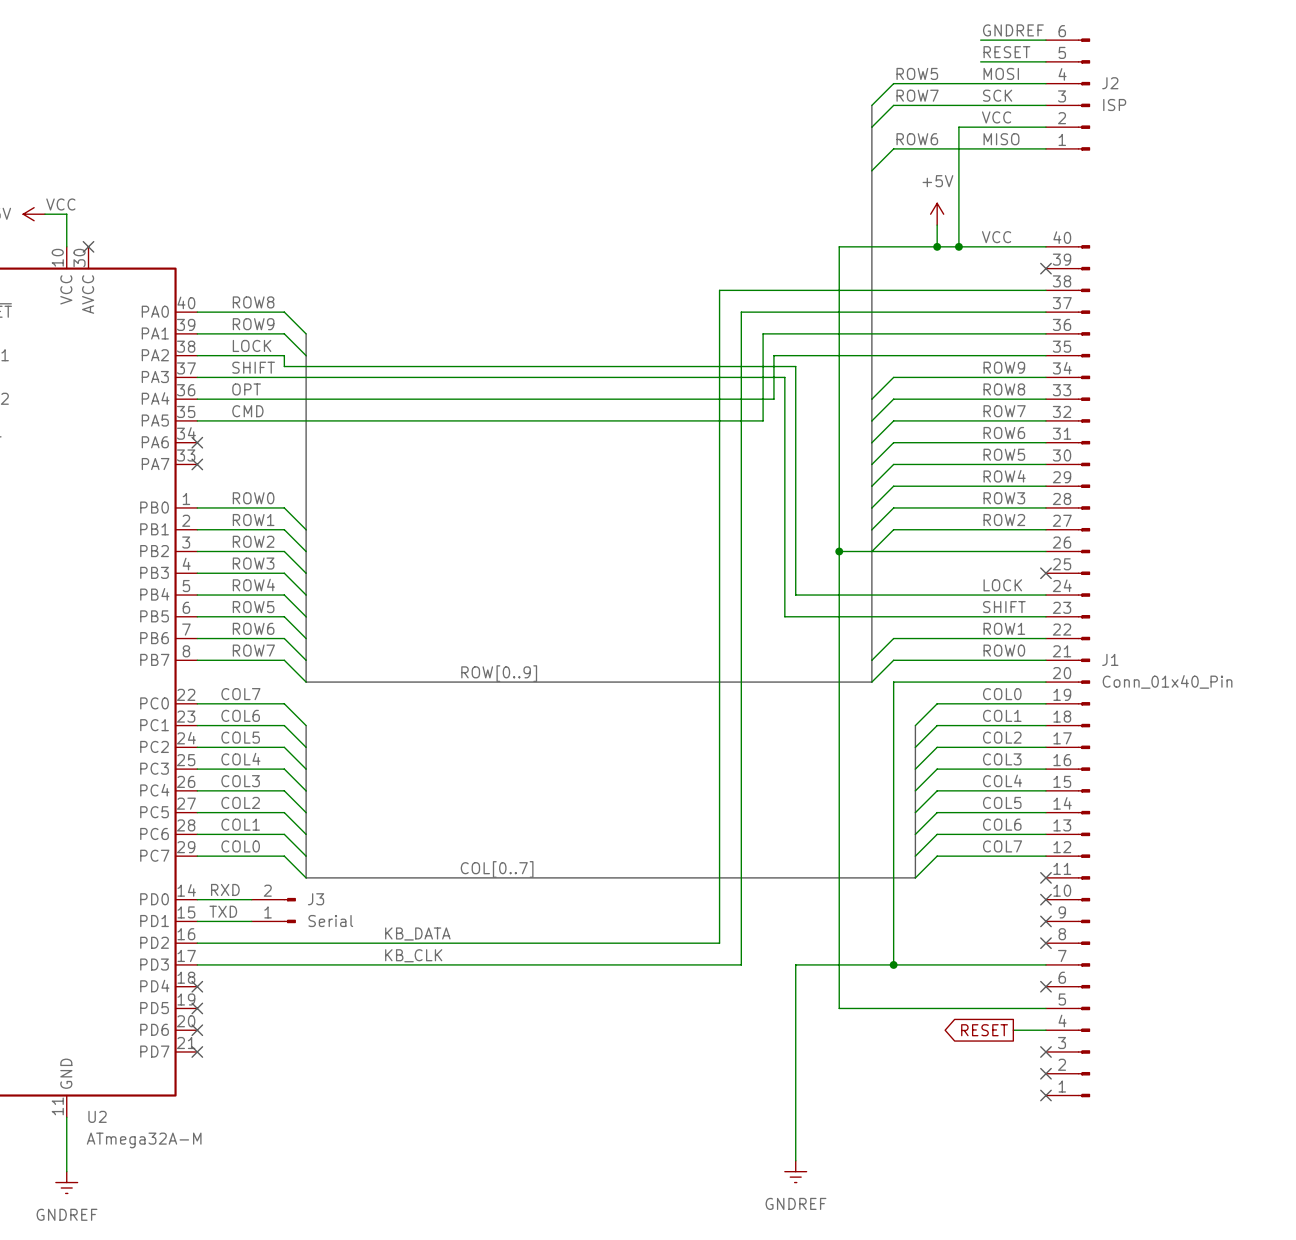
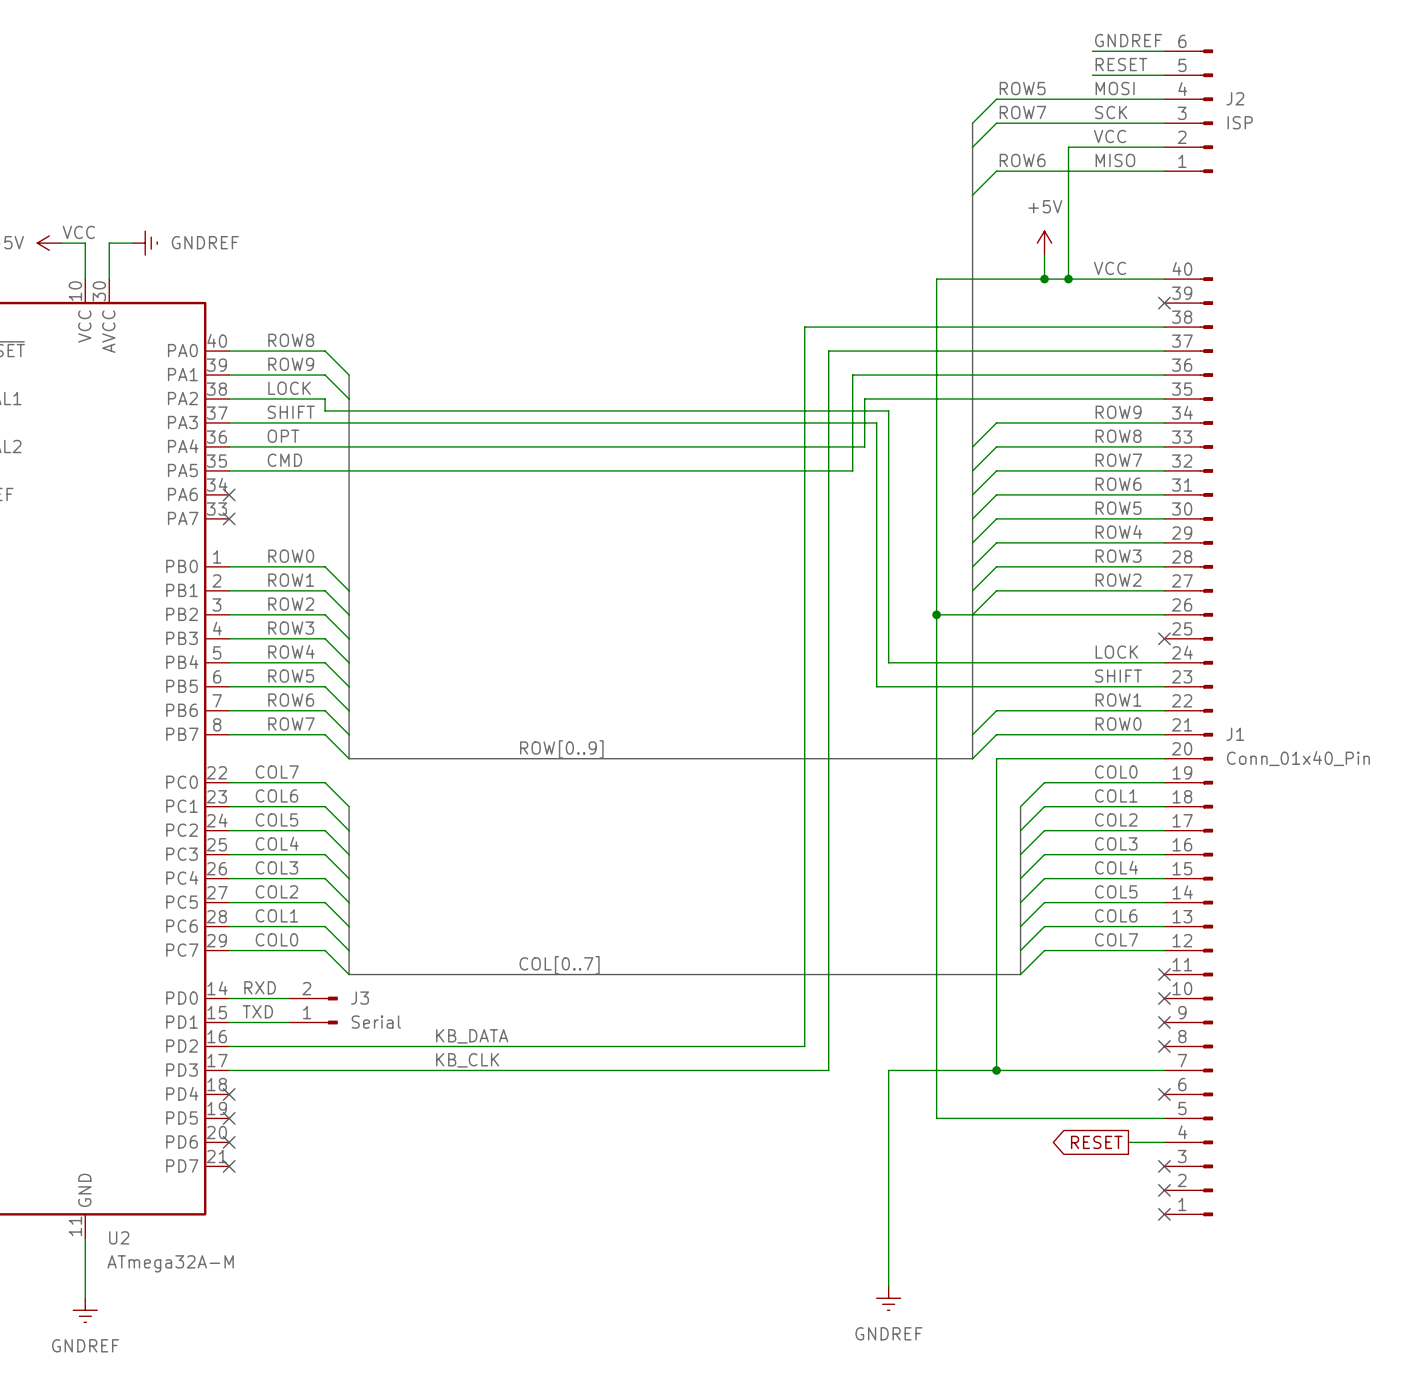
wire: none -> (133, 243) (109, 243) (109, 279)
power symbol: none -> GNDREF (145, 243)
no-connect mark: (88, 246) -> none

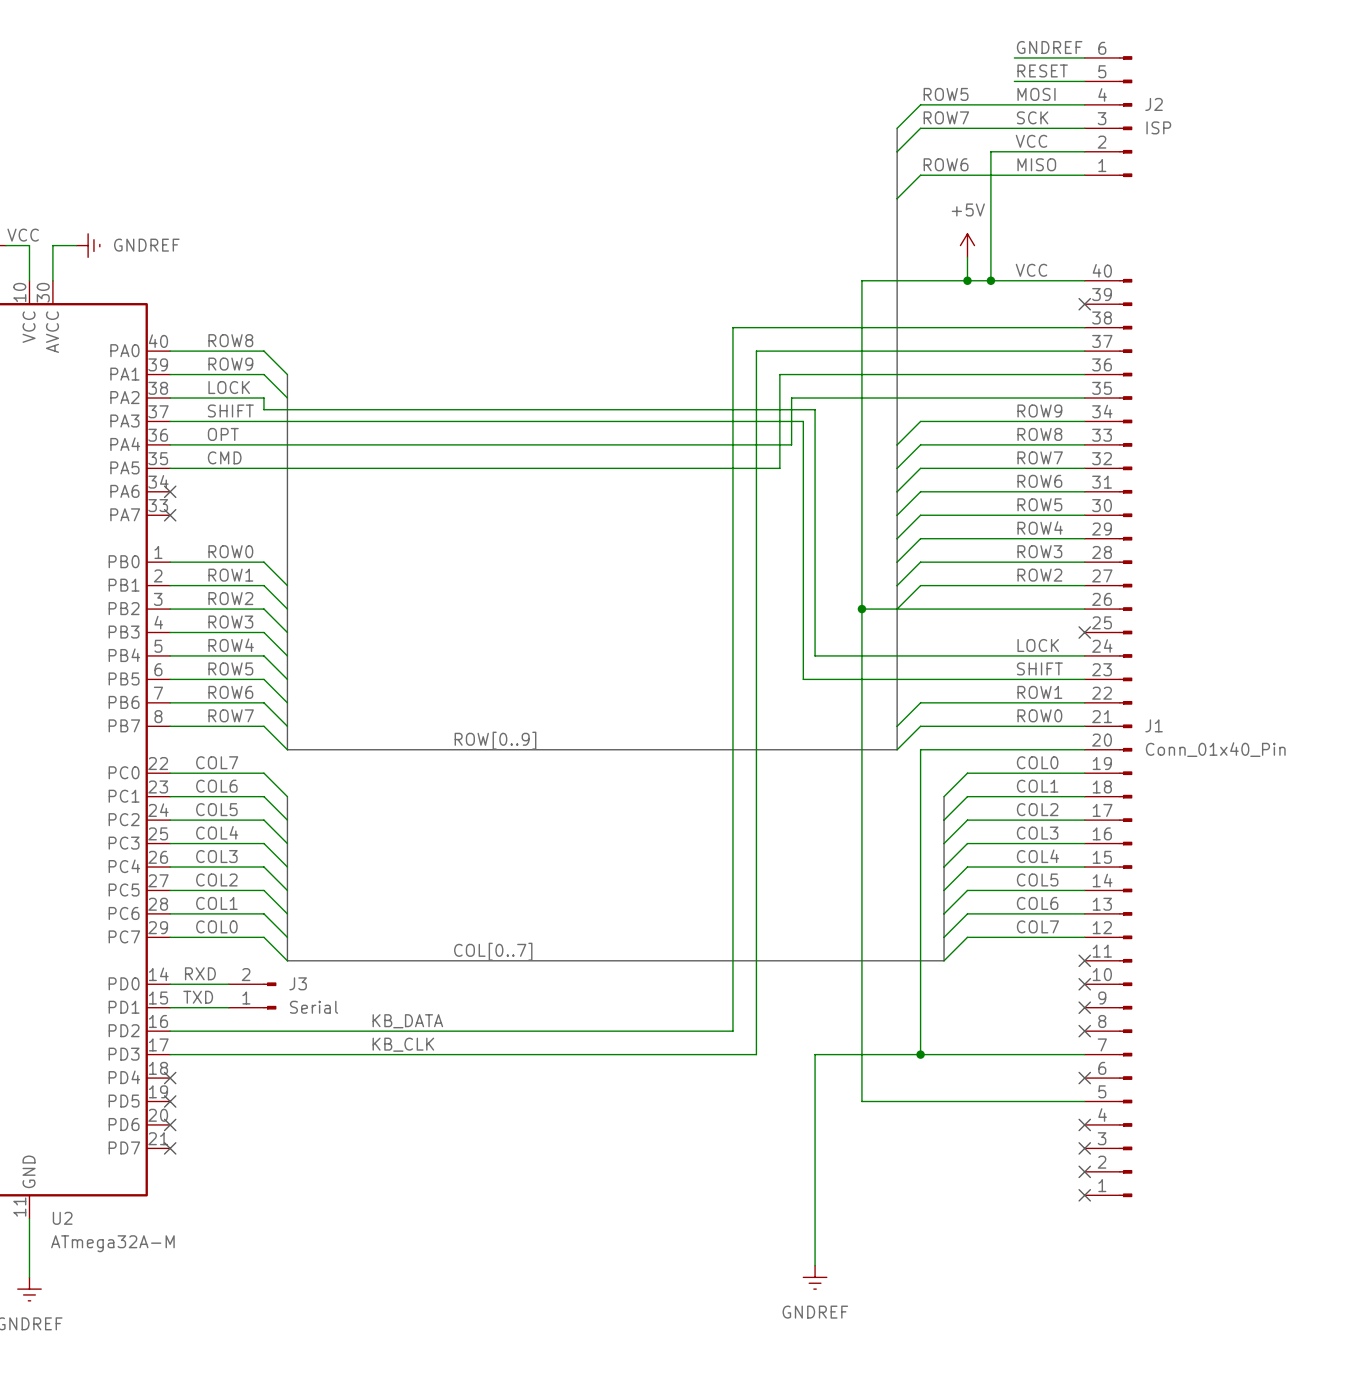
global label: RESET (1096, 1142) -> none
wire: (1128, 1142) (1164, 1142) -> none
no-connect mark: none -> (1084, 1124)

